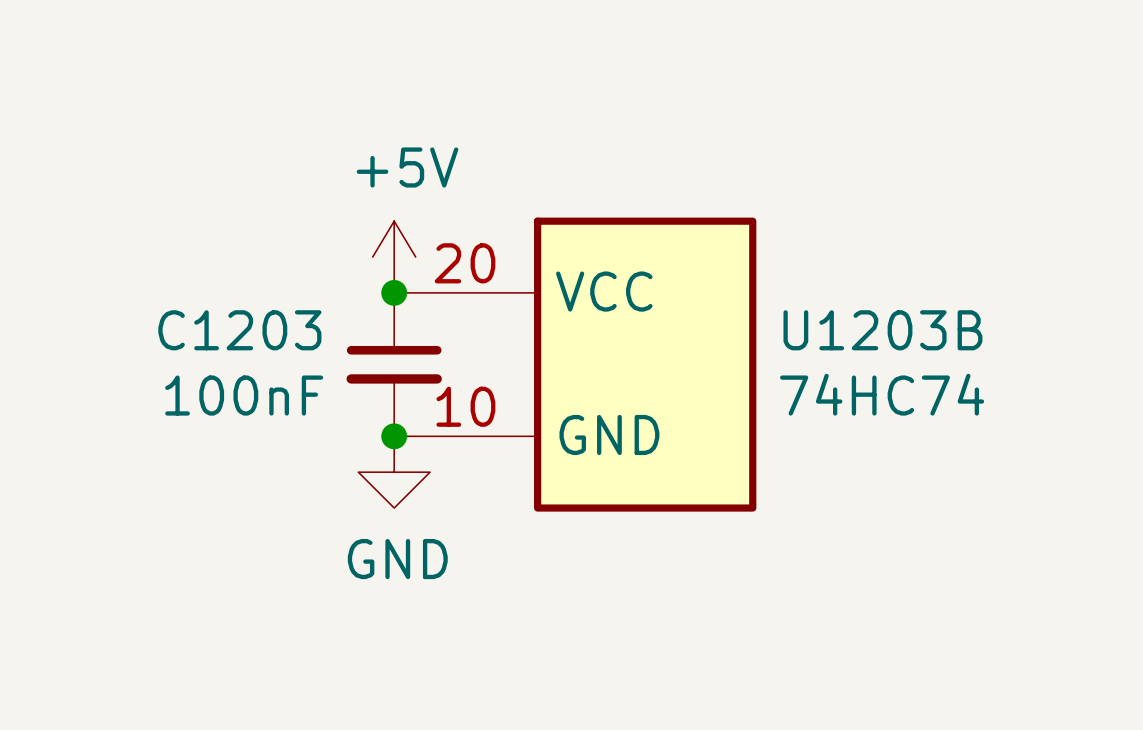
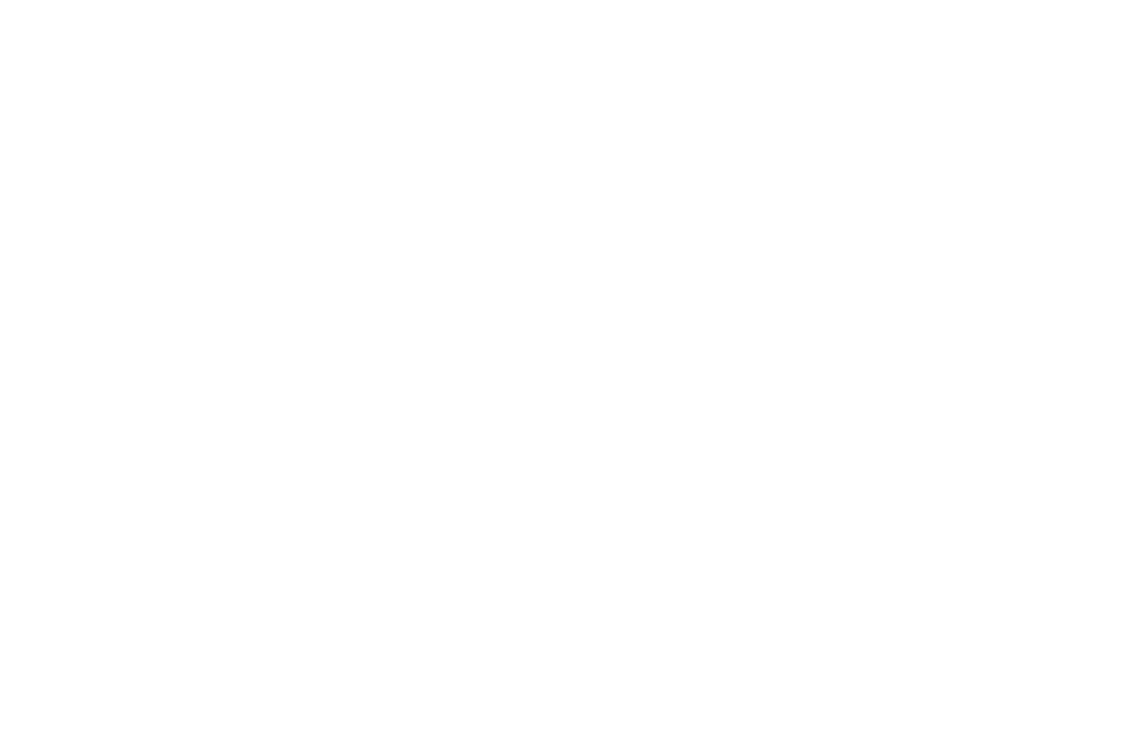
power symbol: +5V (394, 257) -> none
junction: (394, 292) -> none
C1203: 100nF (394, 364) -> none
U1203B: 74HC74 (575, 364) -> none
junction: (394, 436) -> none
power symbol: GND (394, 472) -> none

